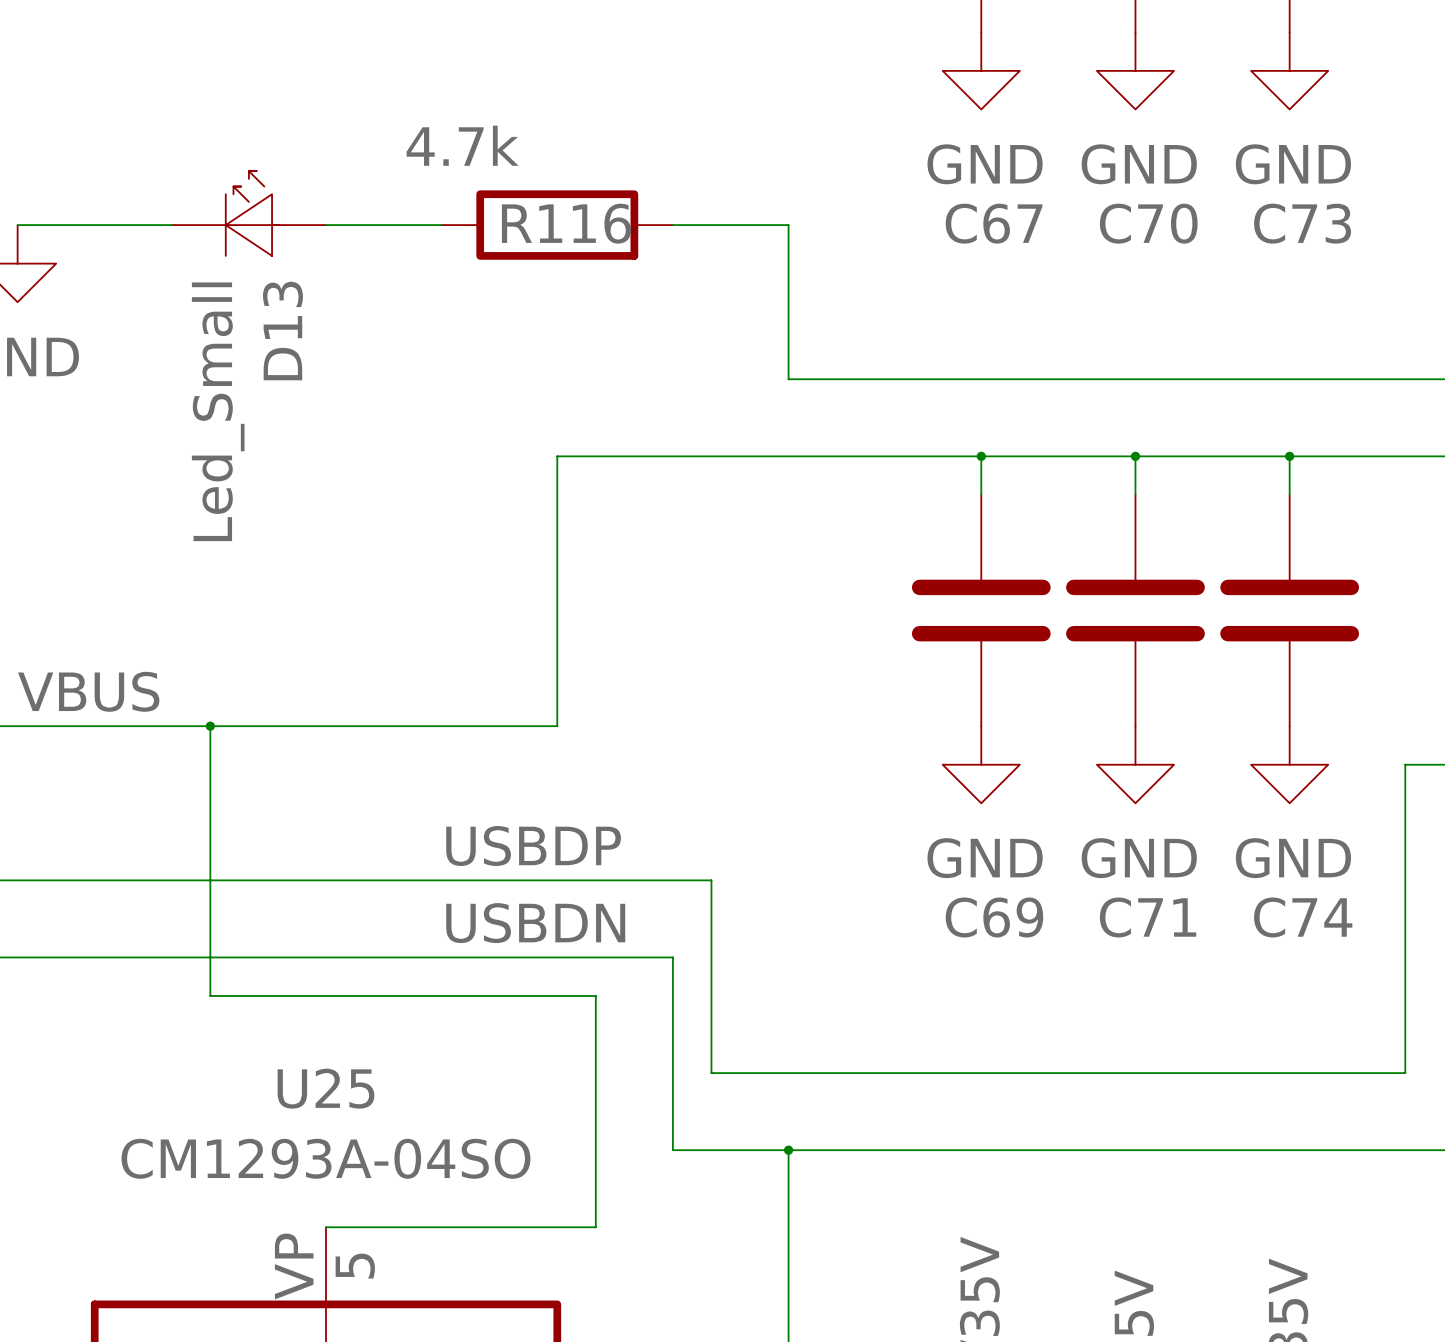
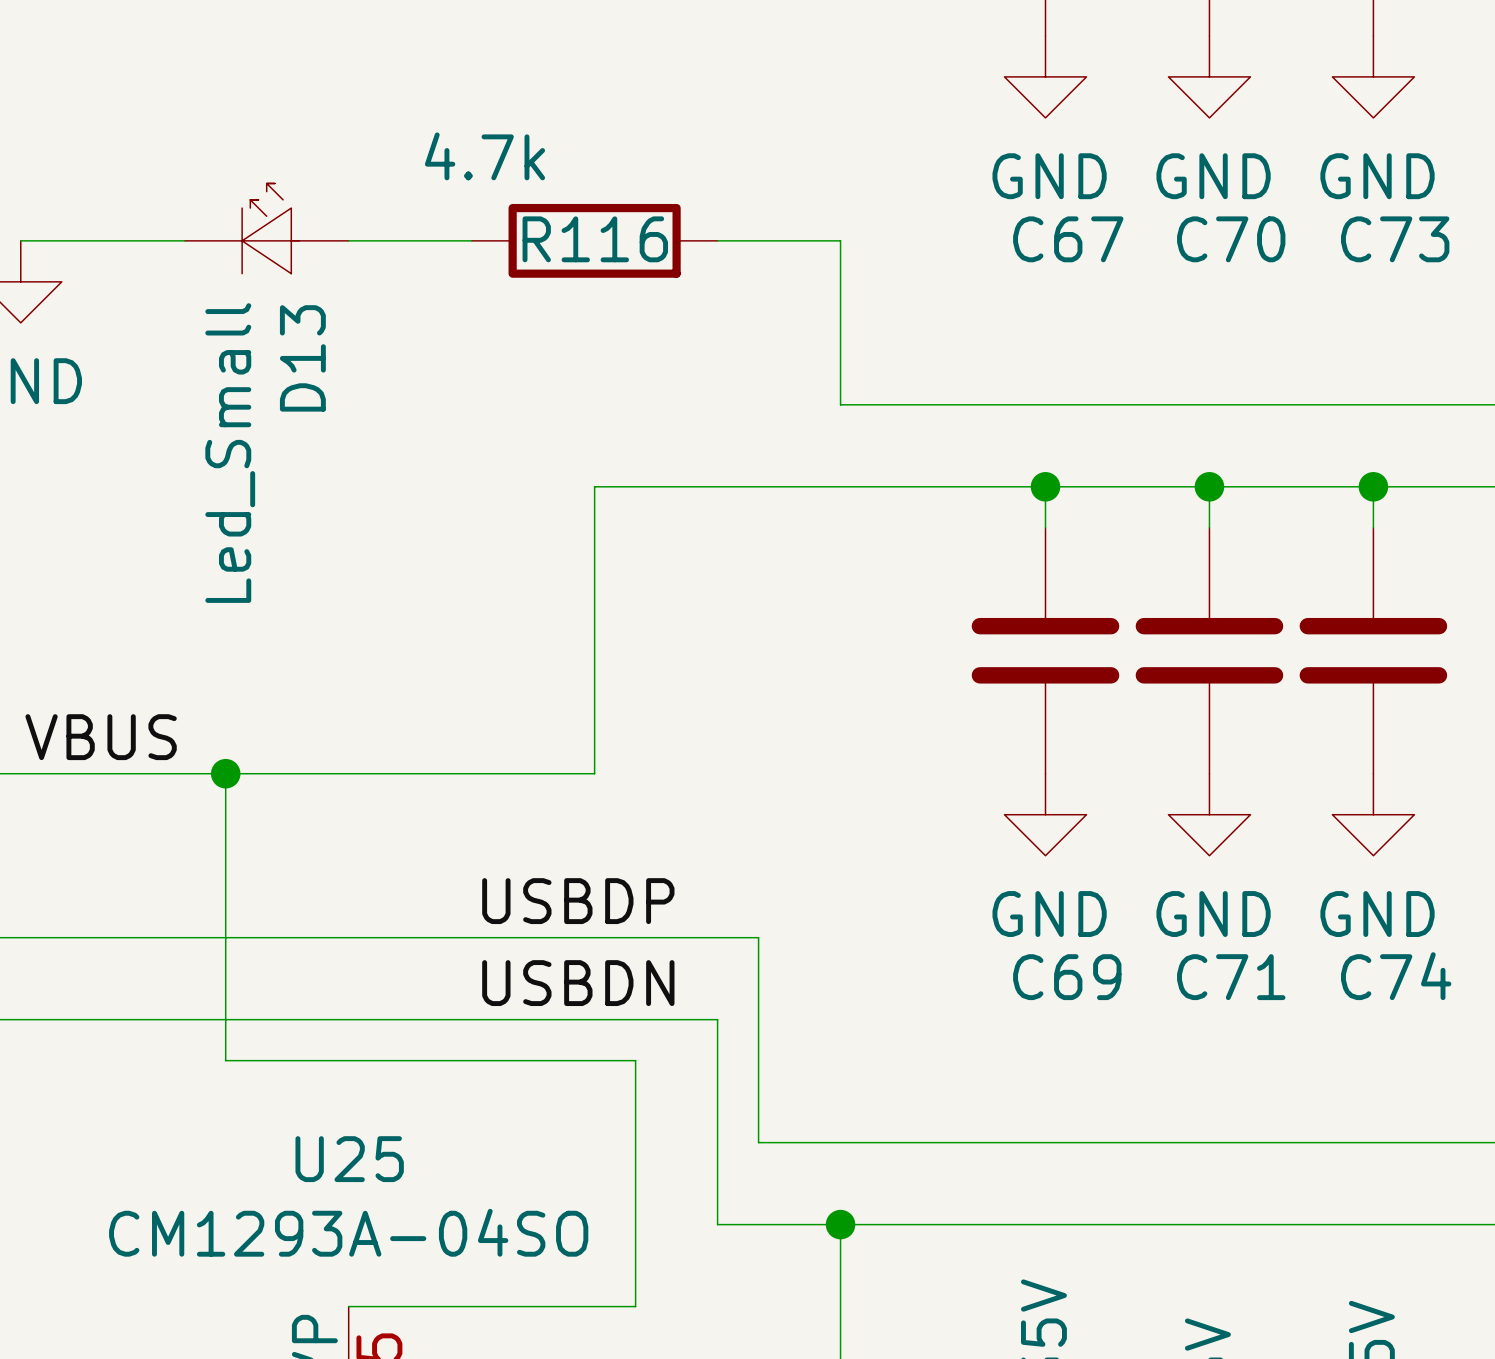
junction size: [976, 451, 986, 461] -> [1030, 472, 1061, 502]
junction size: [1130, 451, 1141, 461] -> [1194, 472, 1225, 502]
junction size: [1285, 451, 1295, 461] -> [1358, 472, 1389, 502]
junction size: [205, 721, 215, 731] -> [210, 758, 241, 789]
junction size: [783, 1145, 794, 1155] -> [825, 1209, 856, 1240]

